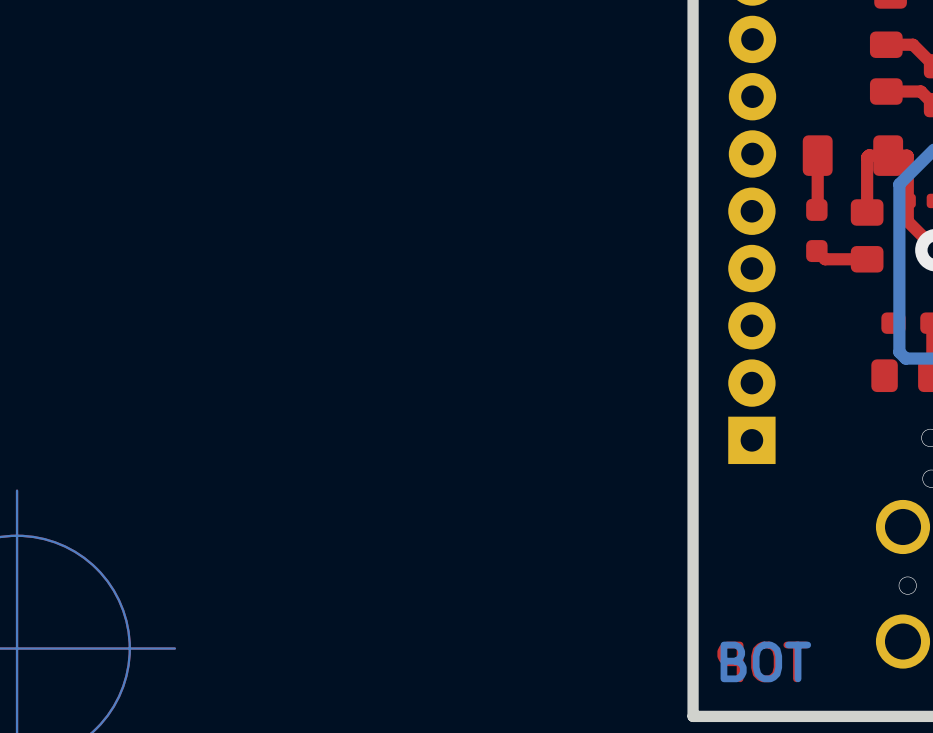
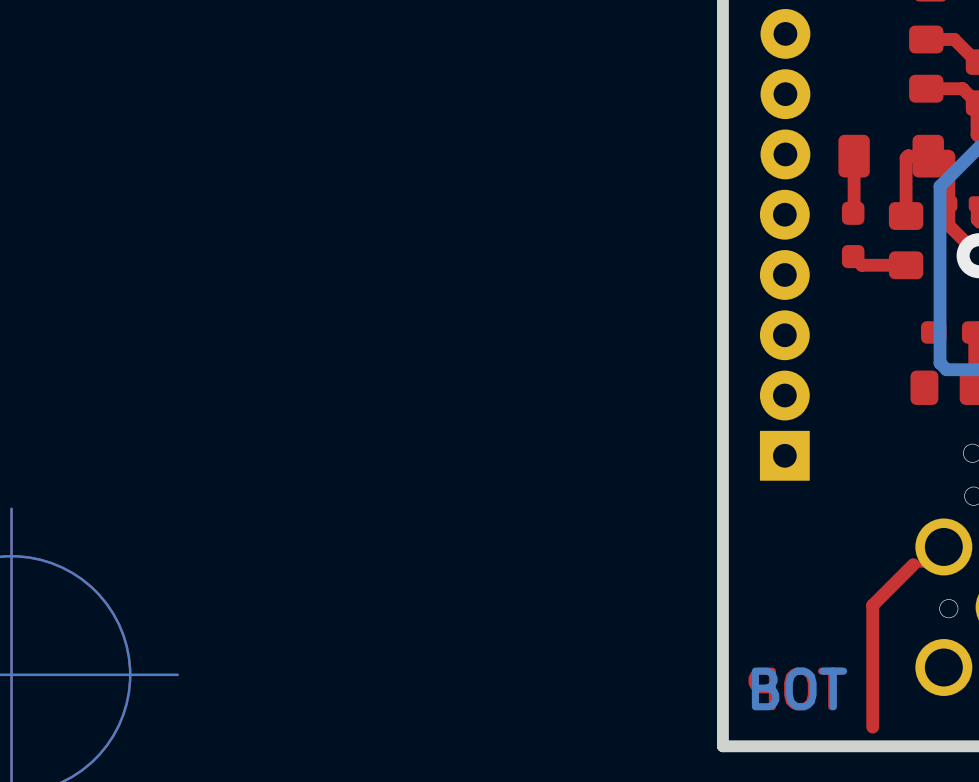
top track: none -> (937, 564) (913, 564) (872, 605) (872, 727)

